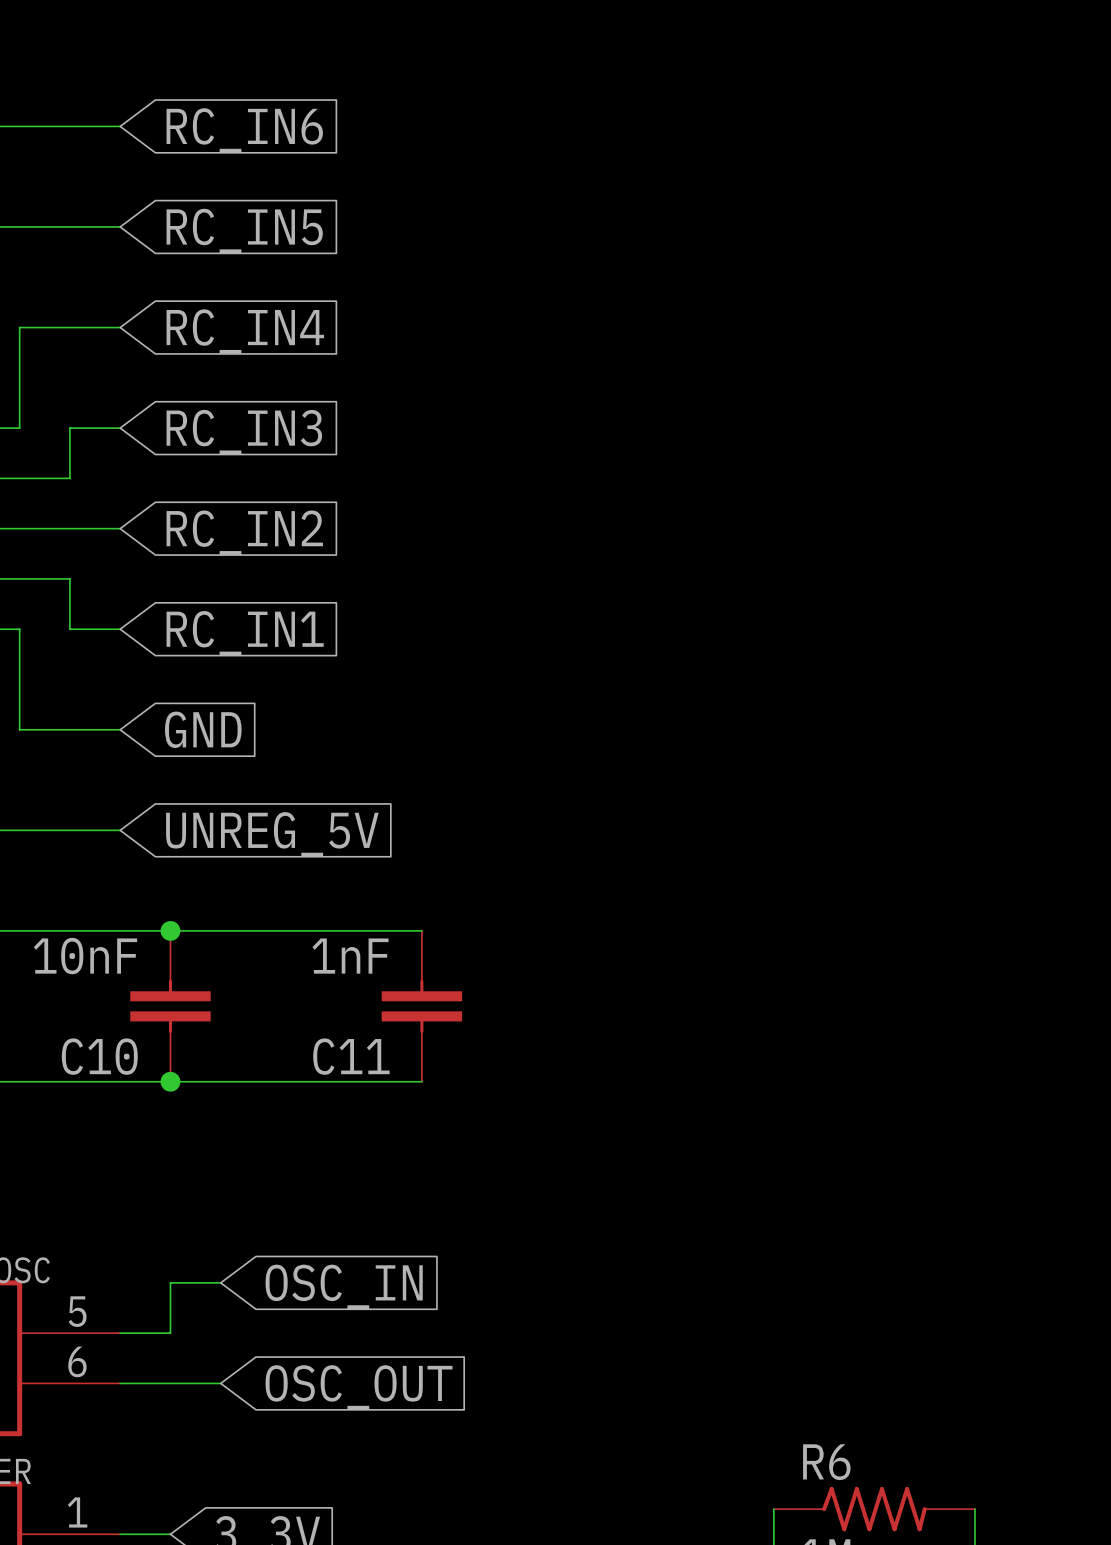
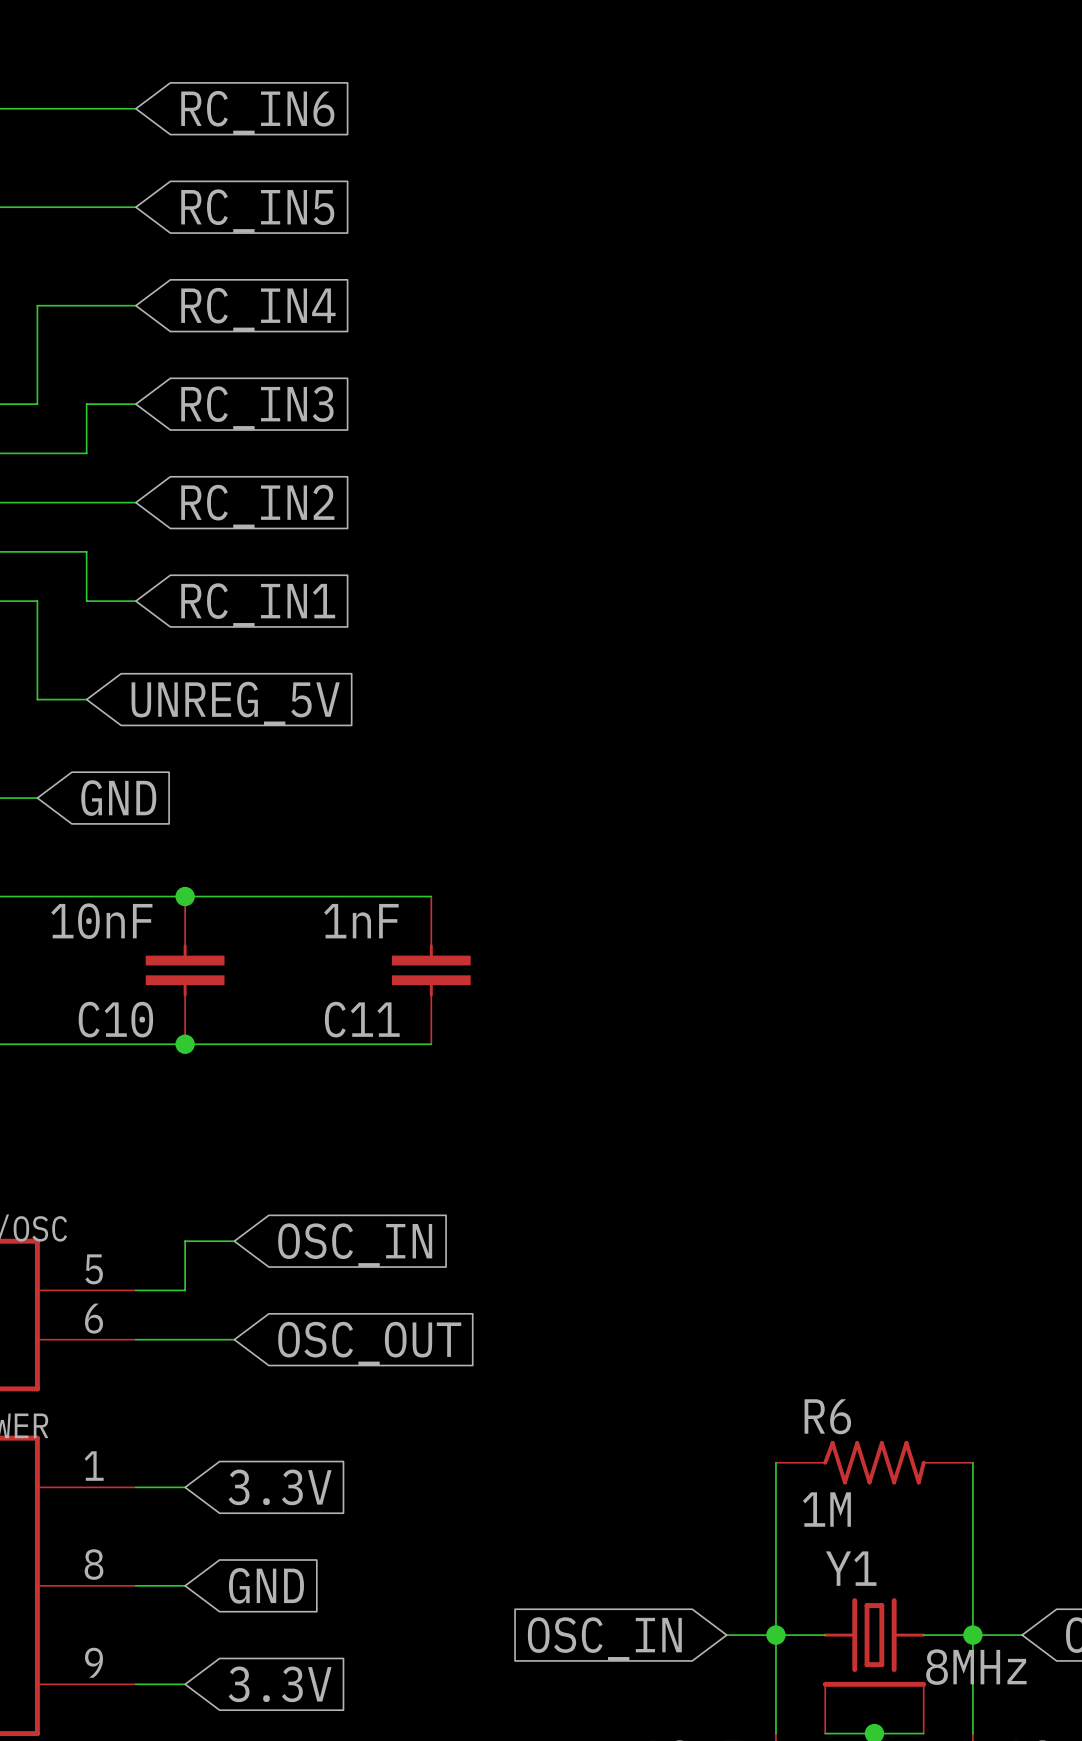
wire: (69, 729) (120, 729) -> none
global label position: GND (203, 729) -> GND (118, 798)
wire: (19, 830) (120, 830) -> none
global label position: UNREG_5V (272, 834) -> UNREG_5V (235, 703)

